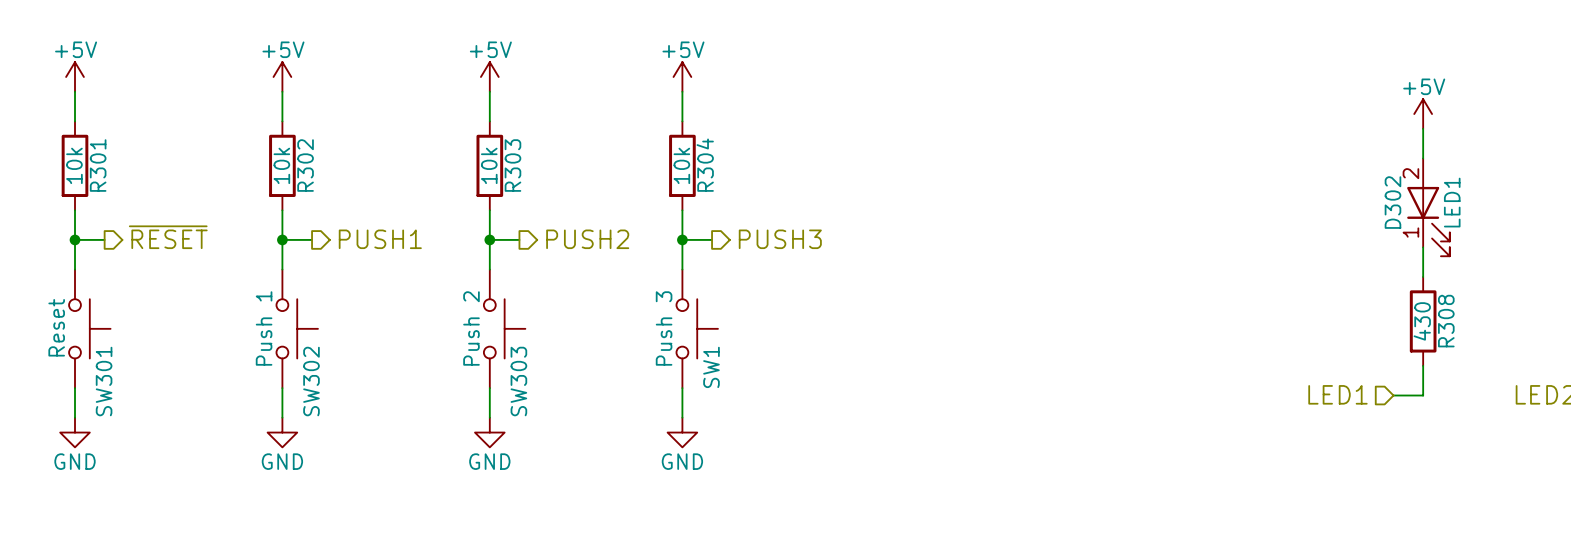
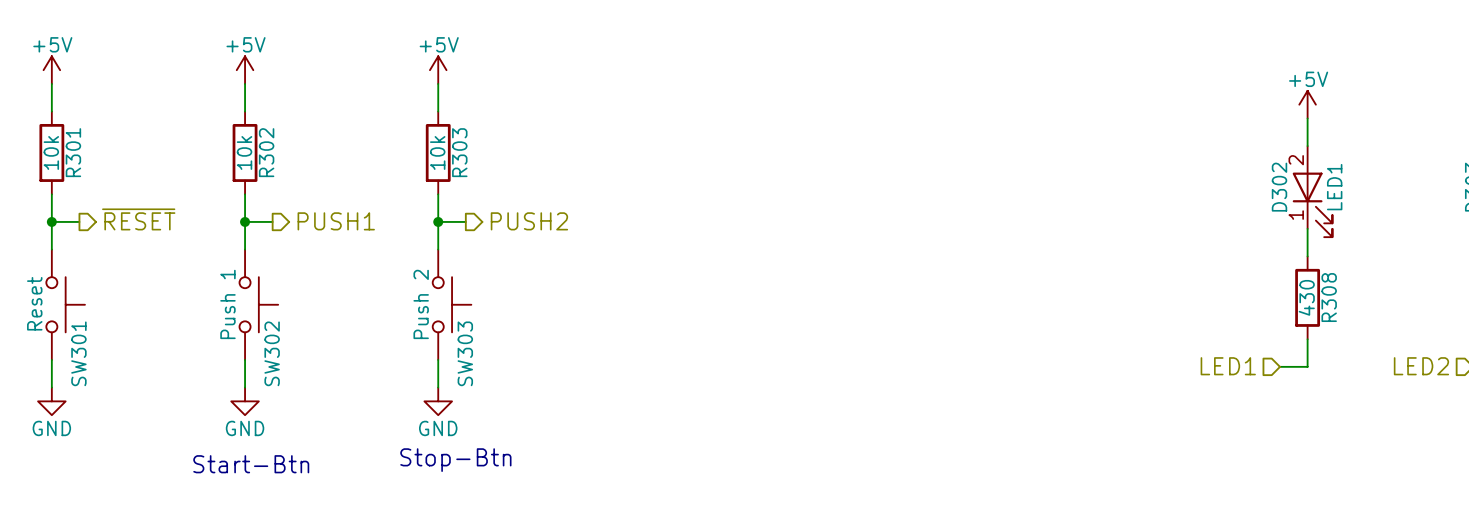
power symbol: +5V (682, 76) -> none
wire: (682, 91) (682, 121) -> none
R304: 10k (682, 165) -> none
wire: (682, 210) (682, 269) -> none
wire: (682, 239) (712, 239) -> none
junction: (682, 239) -> none
hierarchical label: PUSH3 (780, 239) -> none
SW1: Push 3 (697, 328) -> none
wire: (682, 388) (682, 417) -> none
power symbol: GND (682, 432) -> none
text: none -> Stop-Btn (455, 460)
text: none -> Start-Btn (251, 464)

